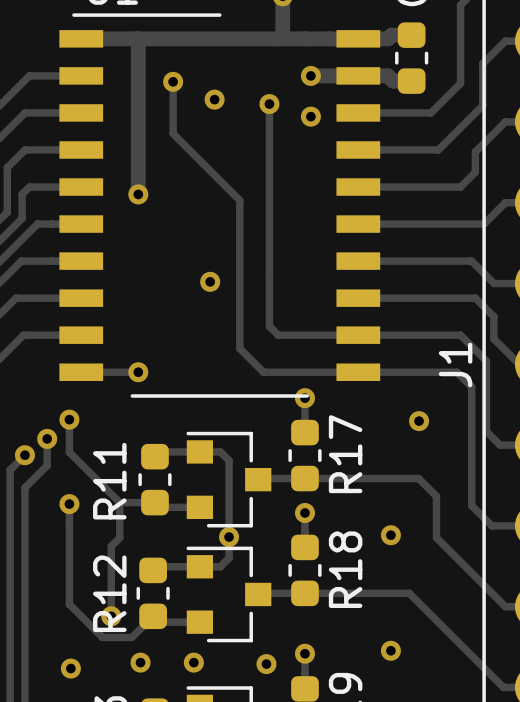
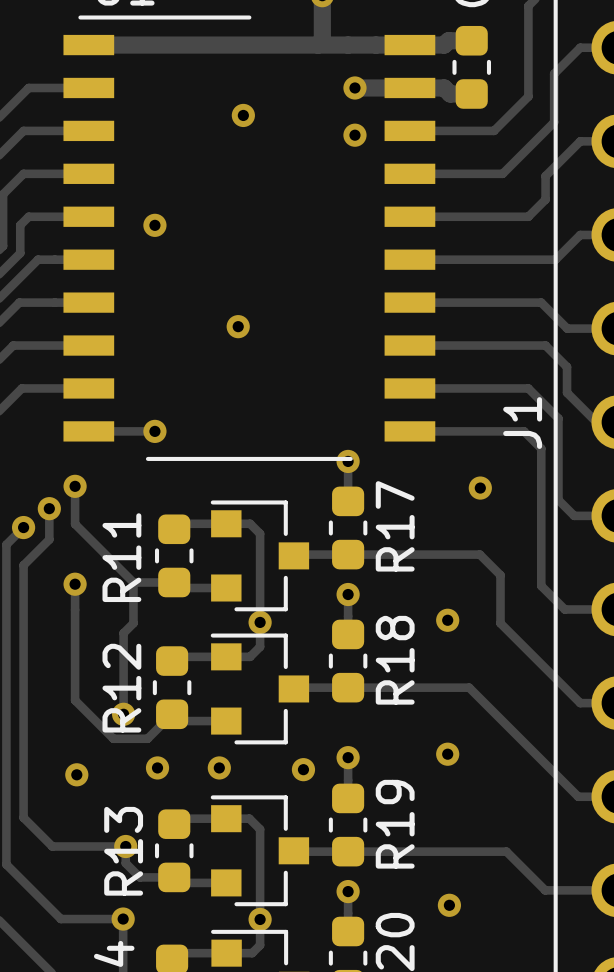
track: (137, 38) (138, 194) -> none
track: (173, 81) (173, 133) (239, 200) (239, 348) (263, 372) (358, 372) -> none
via: (173, 81) -> none
track: (269, 104) (269, 326) (278, 335) (358, 335) -> none
via: (269, 104) -> none

